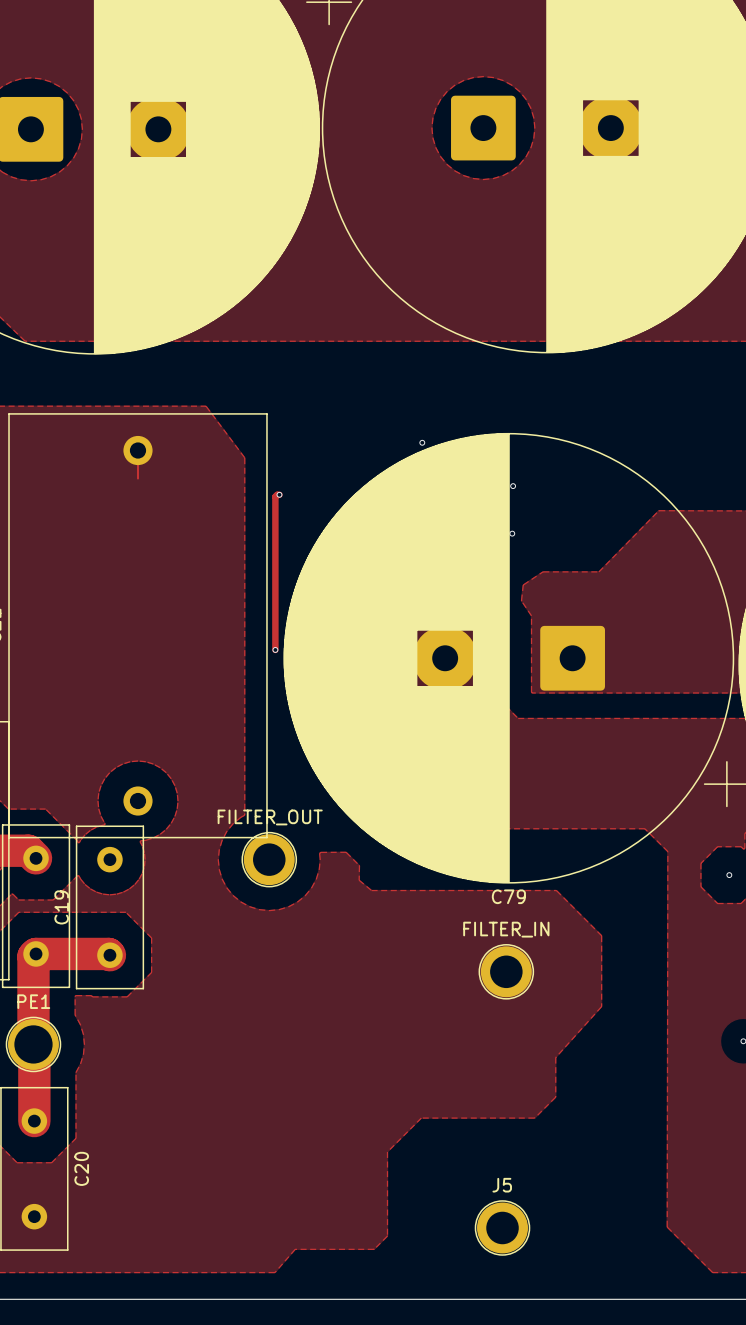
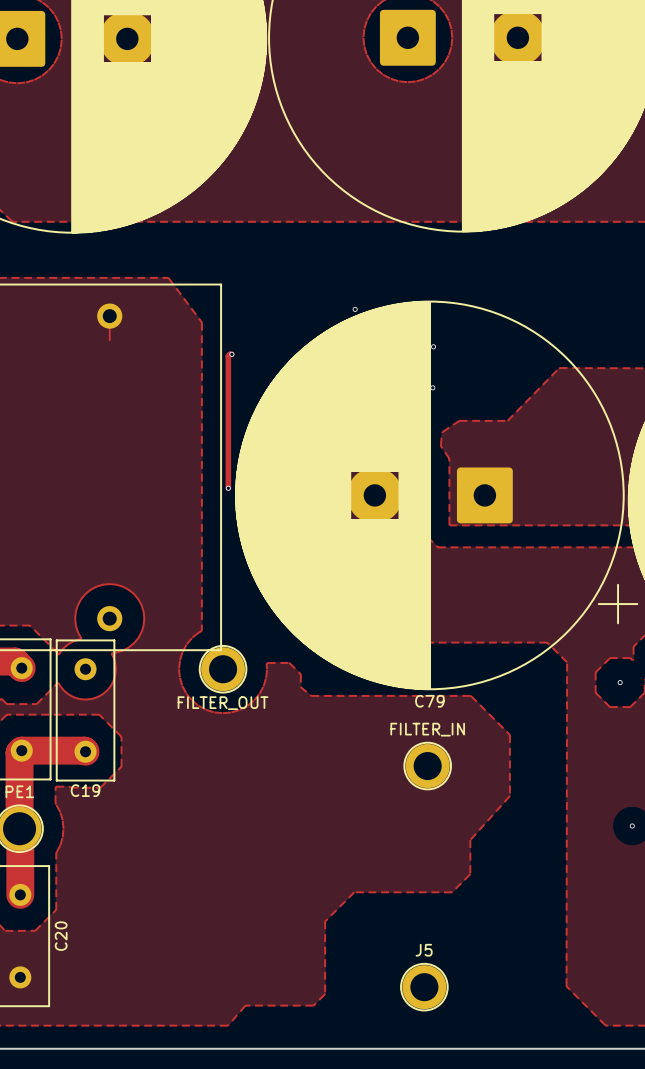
FILTER_OUT name position: FILTER_OUT (270, 817) -> FILTER_OUT (223, 703)
C19 name rotation: 0° (61, 907) -> 90° clockwise (85, 790)
C19 name position: C19 (61, 907) -> C19 (85, 790)

